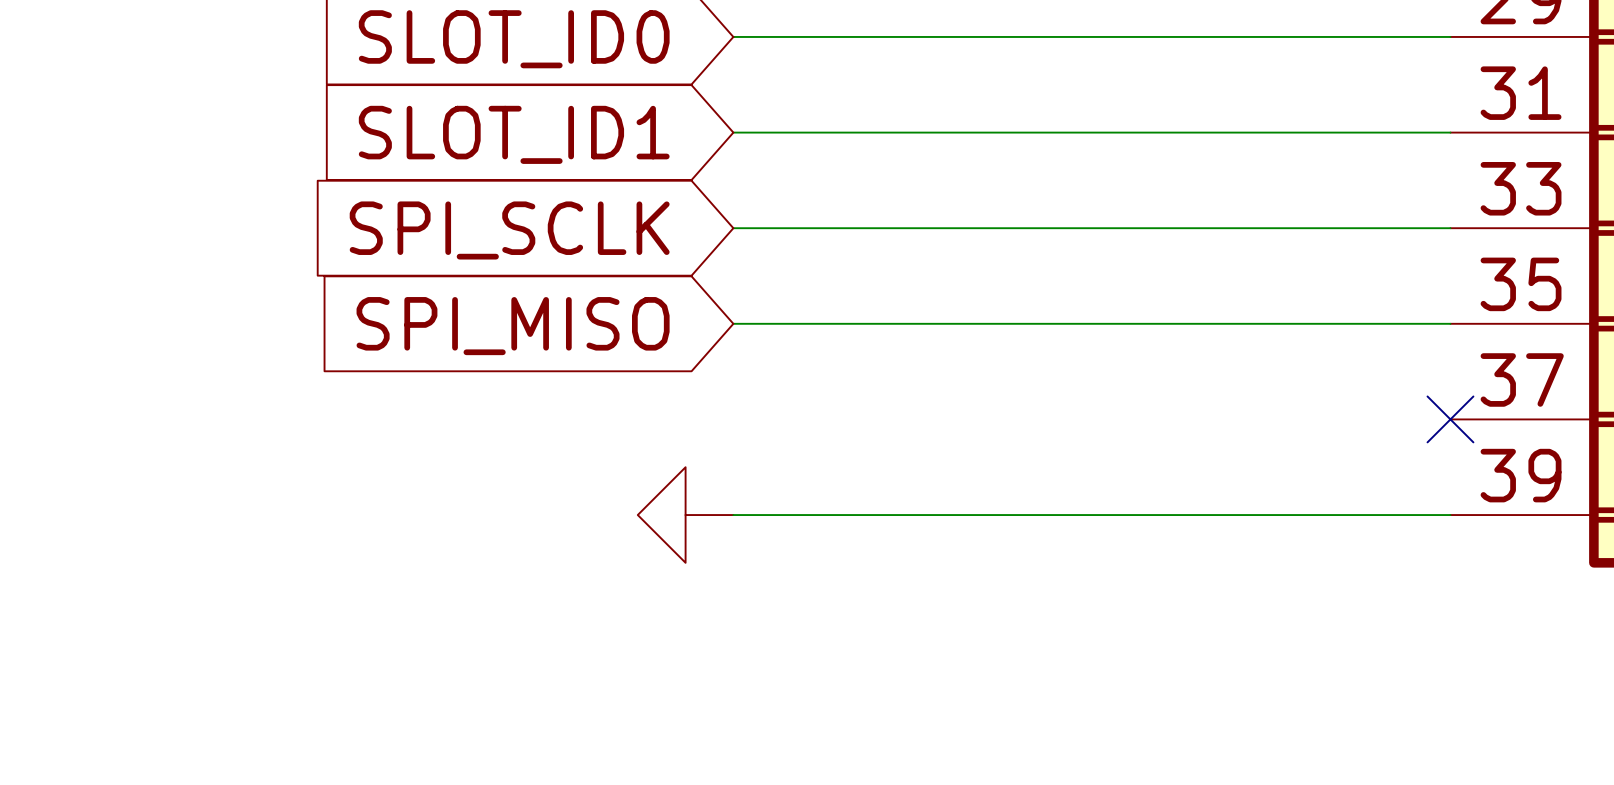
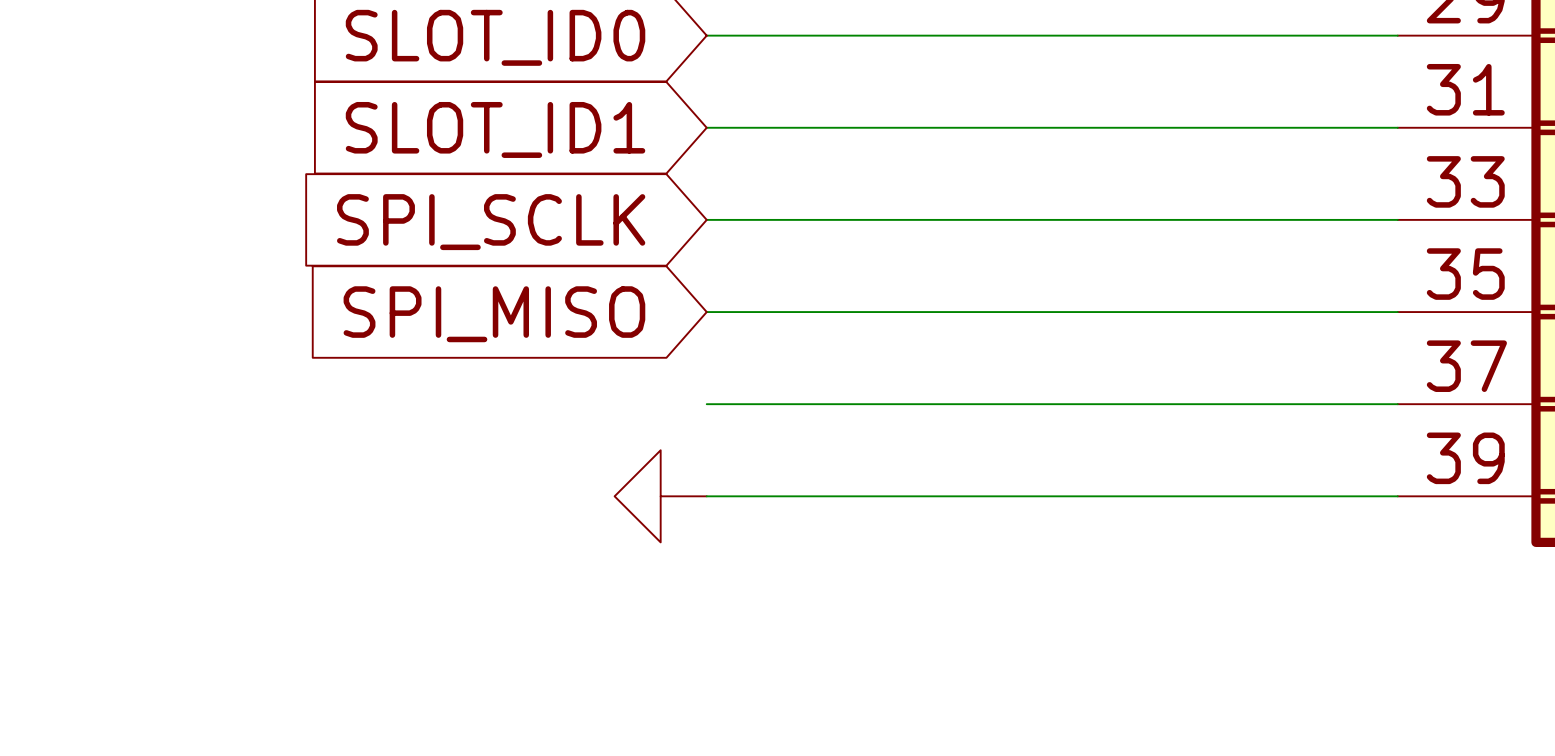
wire: none -> (706, 404) (1397, 404)
no-connect mark: (1450, 419) -> none

